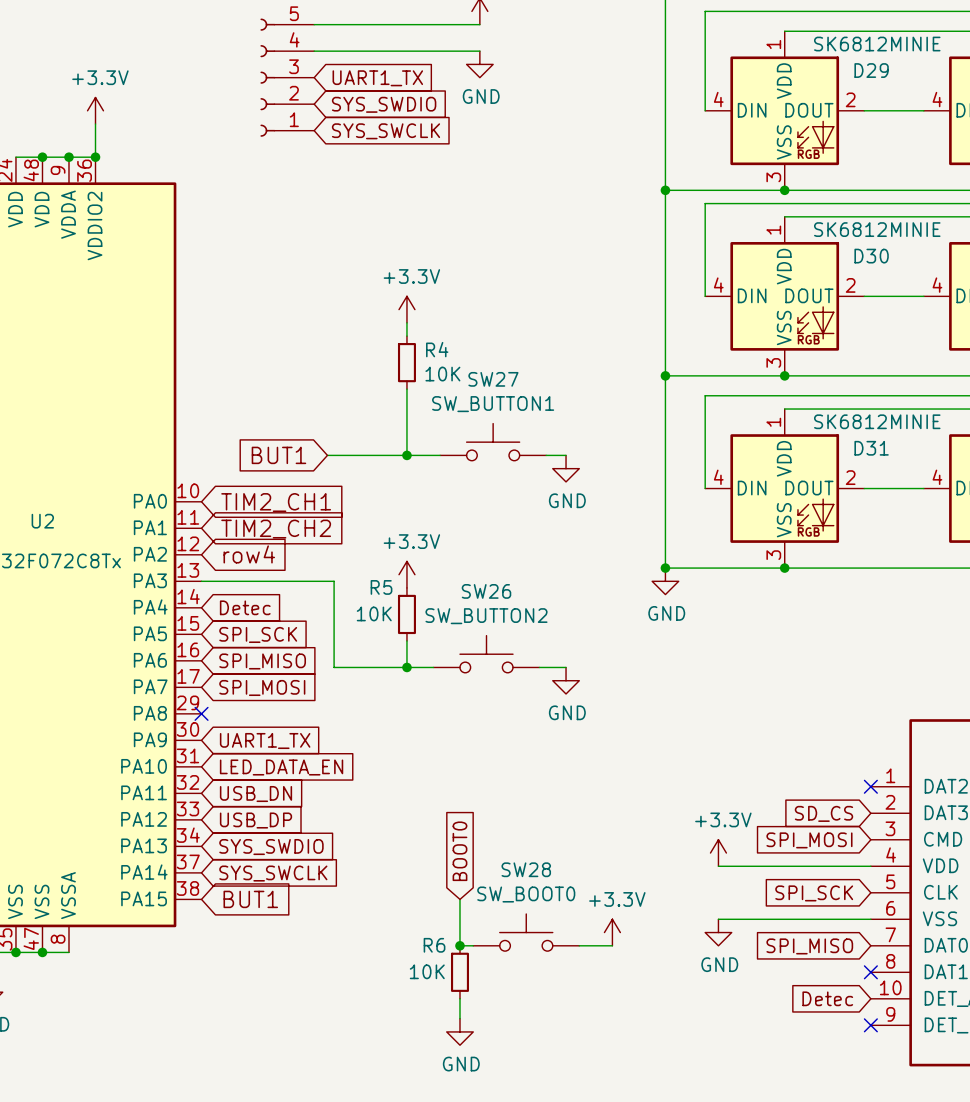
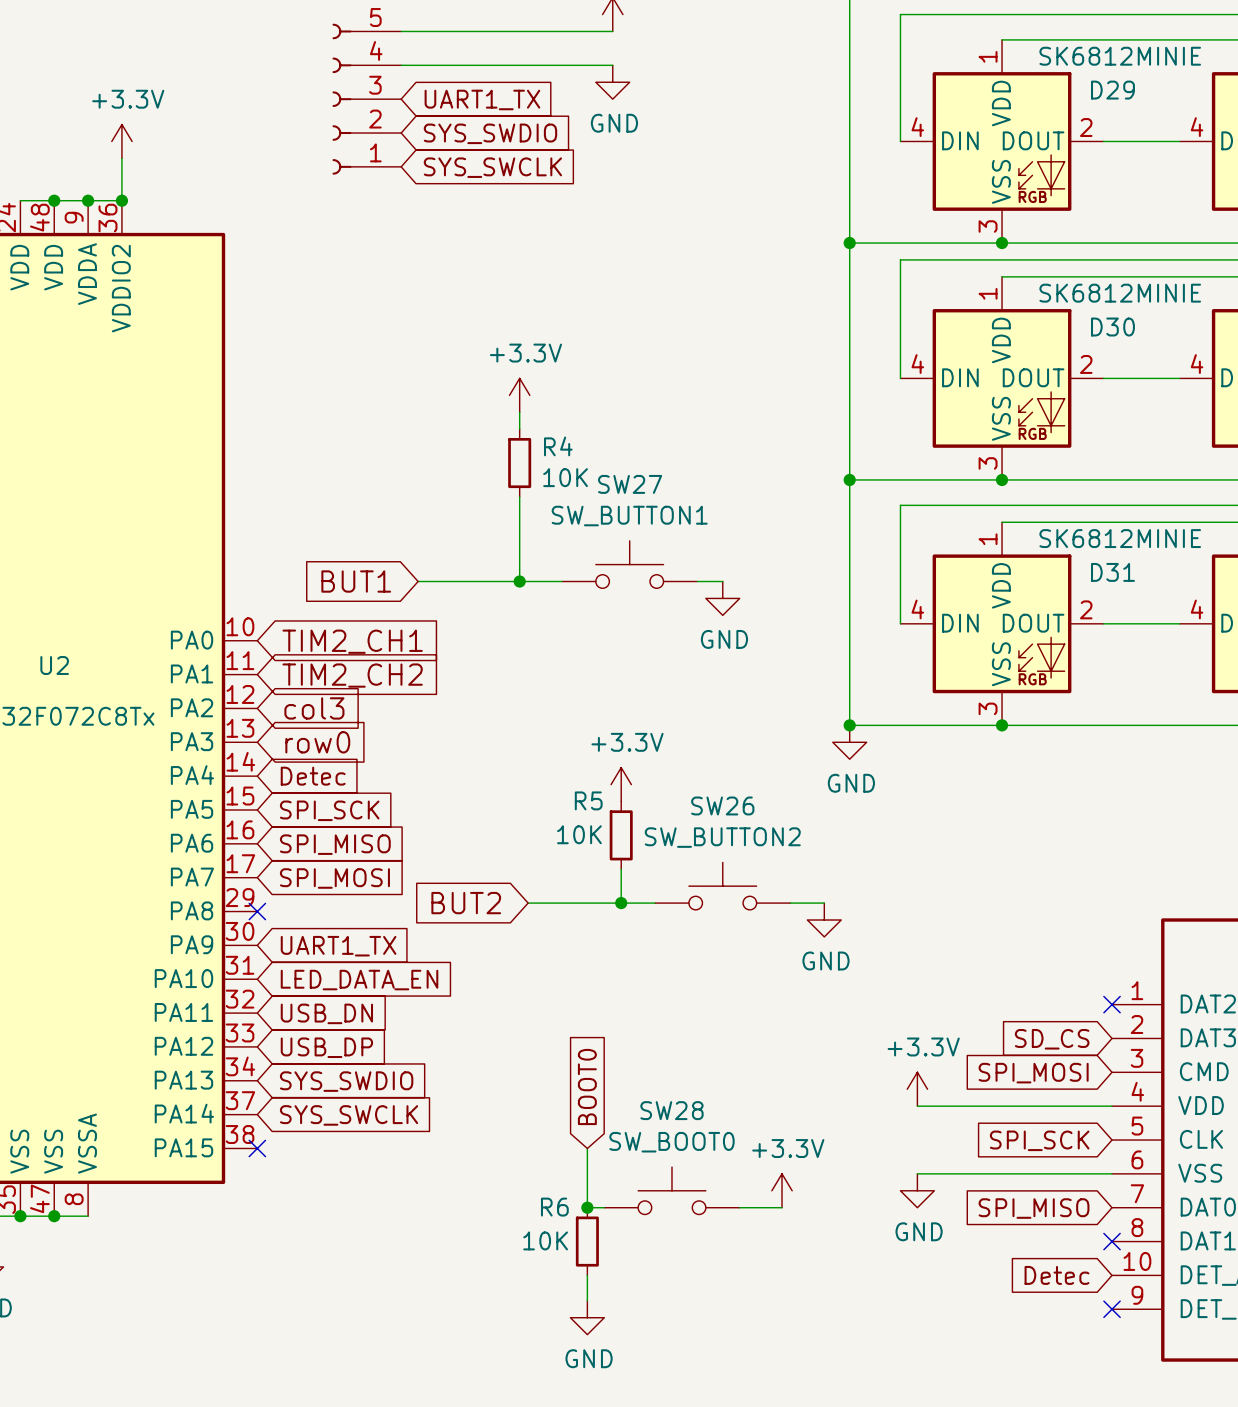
global label: row4 (249, 554) -> col3 (314, 708)
power symbol position: +3.3V (406, 574) -> +3.3V (621, 784)
wire: (201, 581) (334, 581) (334, 667) (433, 667) -> none
global label: none -> row0 (317, 742)
R5 position: (406, 614) -> (621, 835)
wire: (406, 640) (406, 667) -> (621, 869) (621, 903)
SW26 position: (486, 654) -> (722, 886)
junction: (406, 667) -> none
wire: (539, 667) (566, 667) -> (790, 903) (824, 903)
power symbol position: GND (566, 680) -> GND (824, 920)
global label: none -> BUT2 (466, 903)
wire: none -> (528, 903) (655, 903)
junction: none -> (621, 903)
no-connect mark: none -> (257, 1148)
global label: BUT1 (250, 899) -> none

